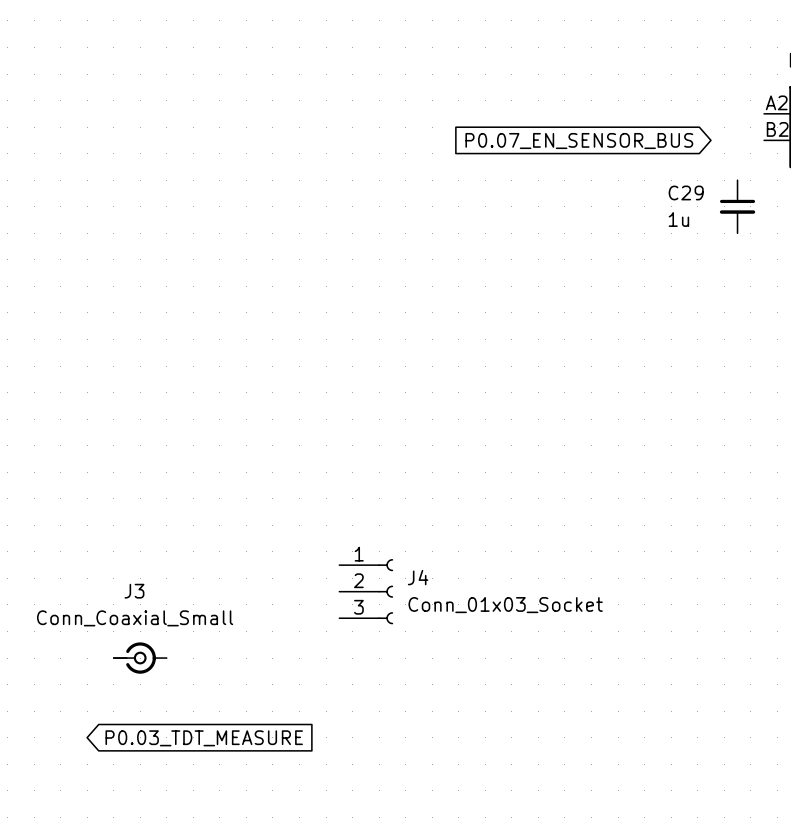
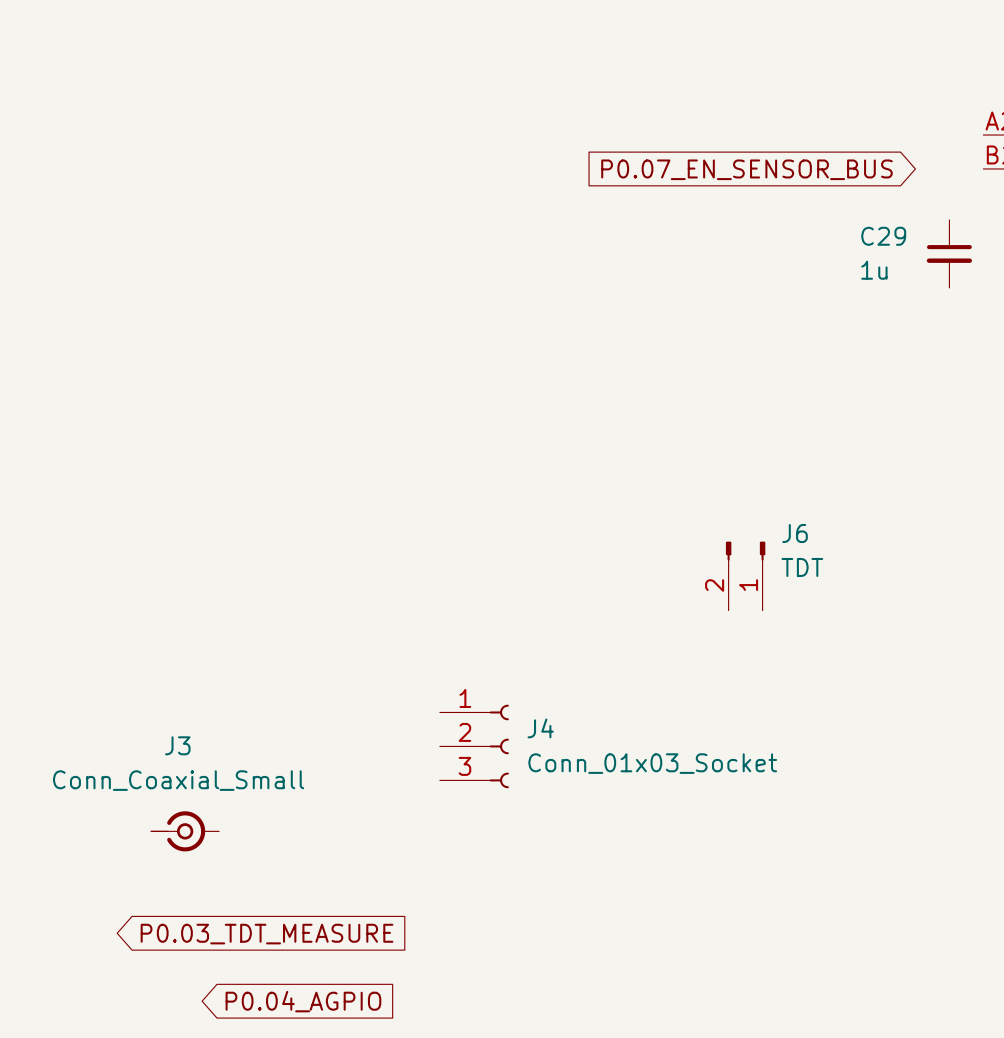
J6: none -> TDT (745, 576)
global label: none -> P0.04_AGPIO (303, 1001)

